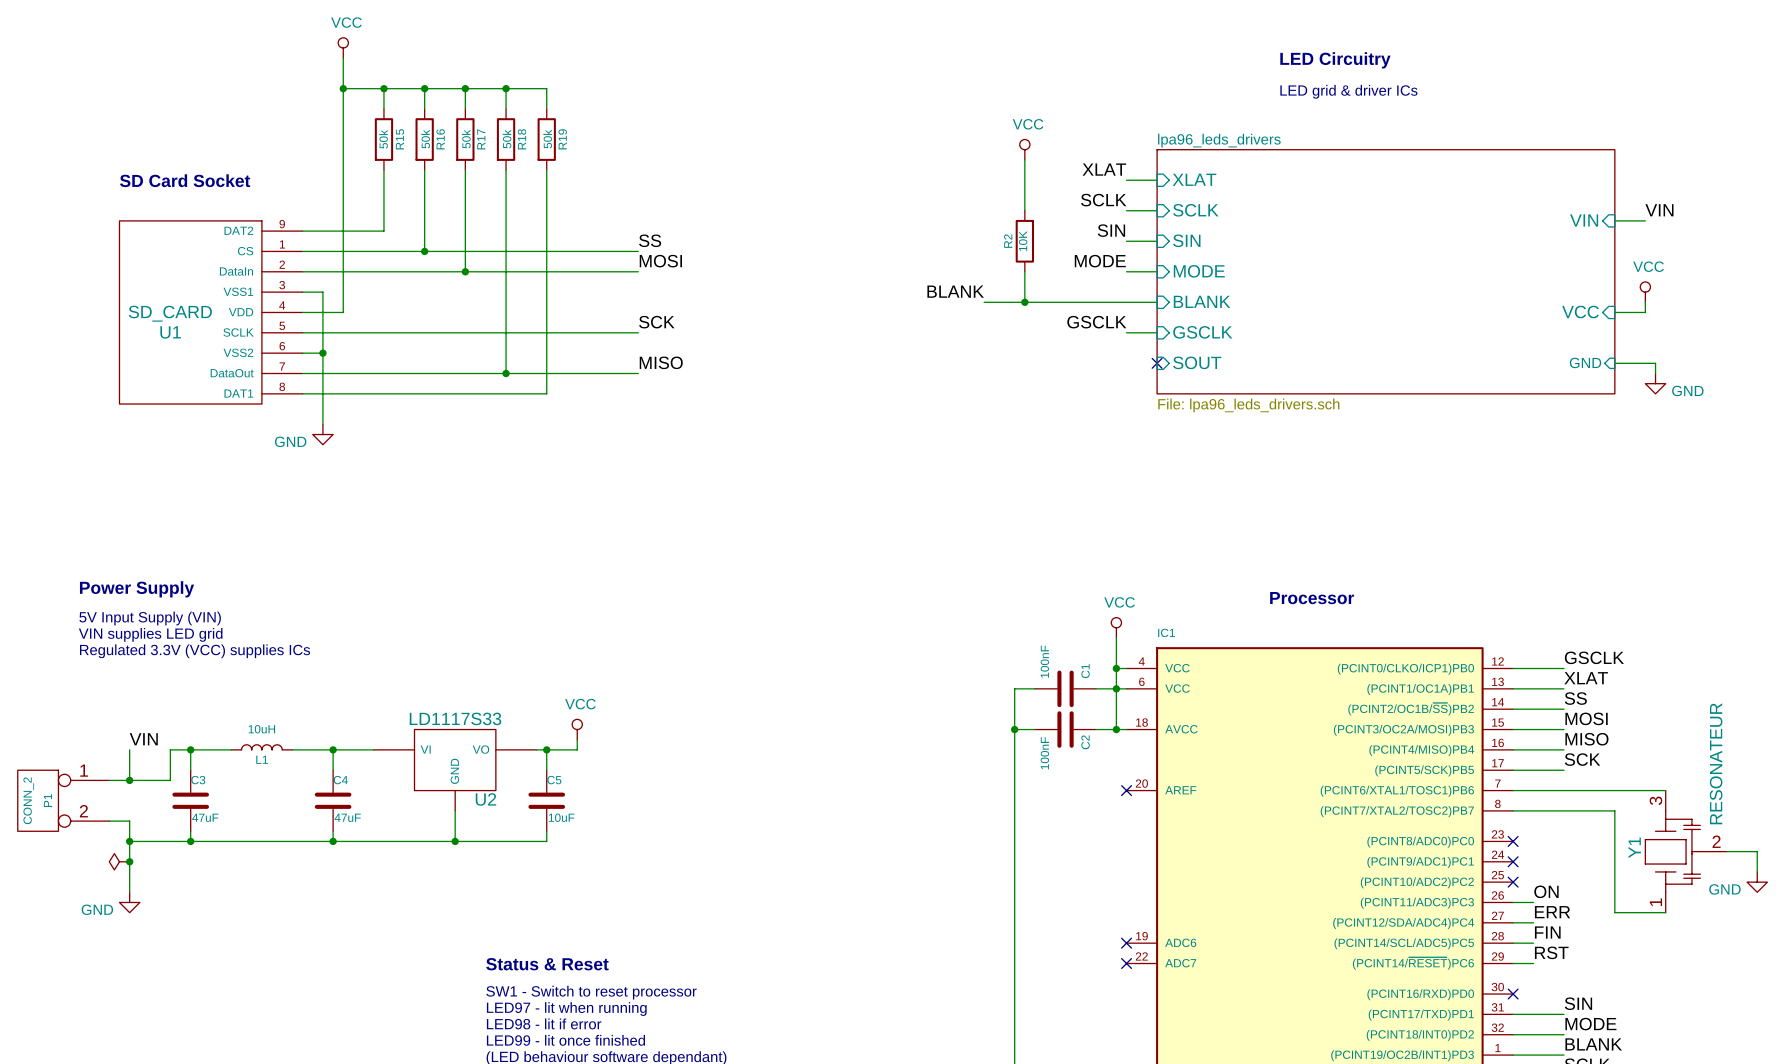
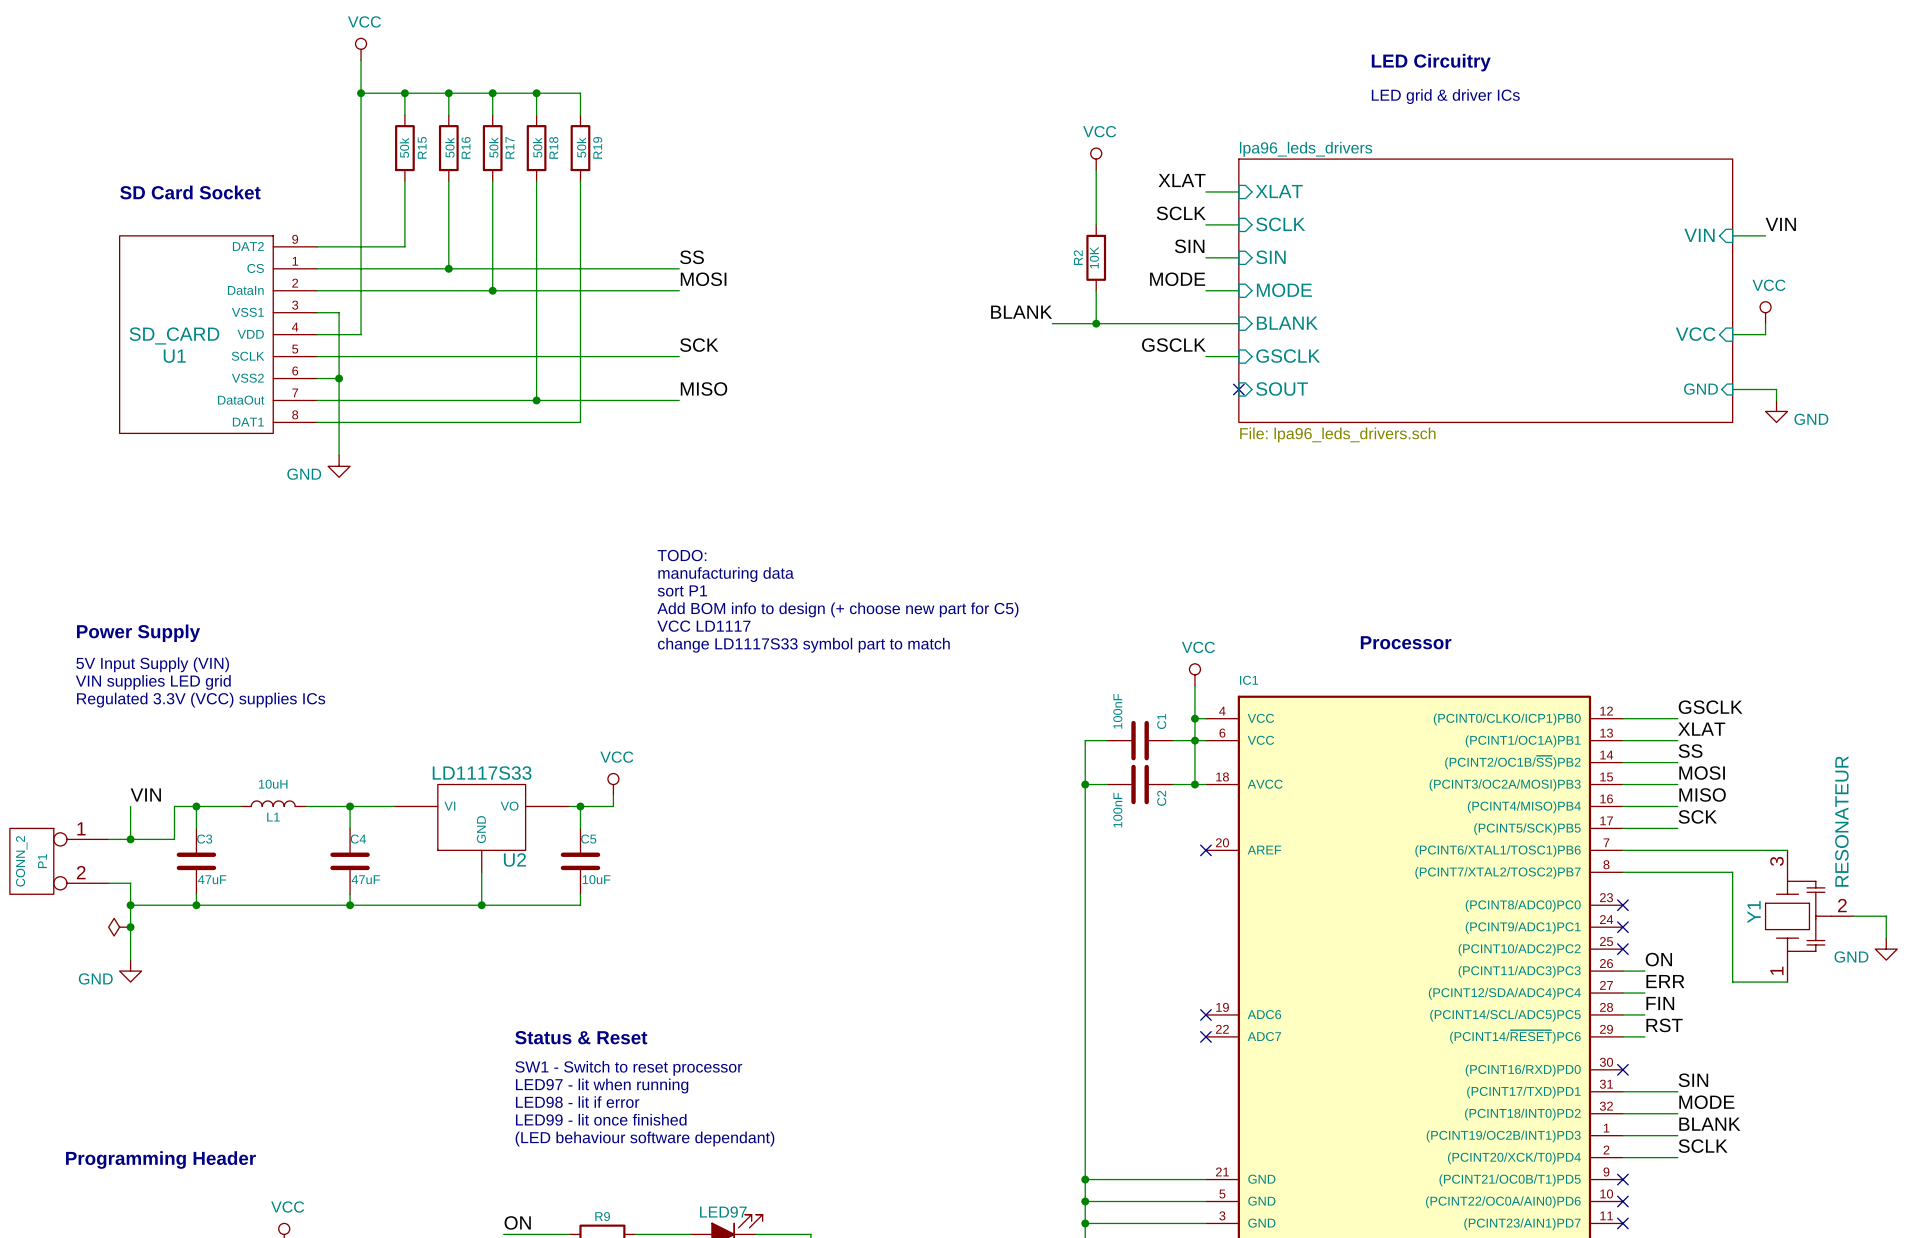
text: none -> TODO: (682, 555)
text: none -> manufacturing data (726, 574)
text: none -> sort P1 (682, 590)
text: none -> Add BOM info to design (+ choose new part for C5) (837, 609)
text: none -> VCC LD1117 (703, 626)
text: none -> change LD1117S33 symbol part to match (803, 645)

